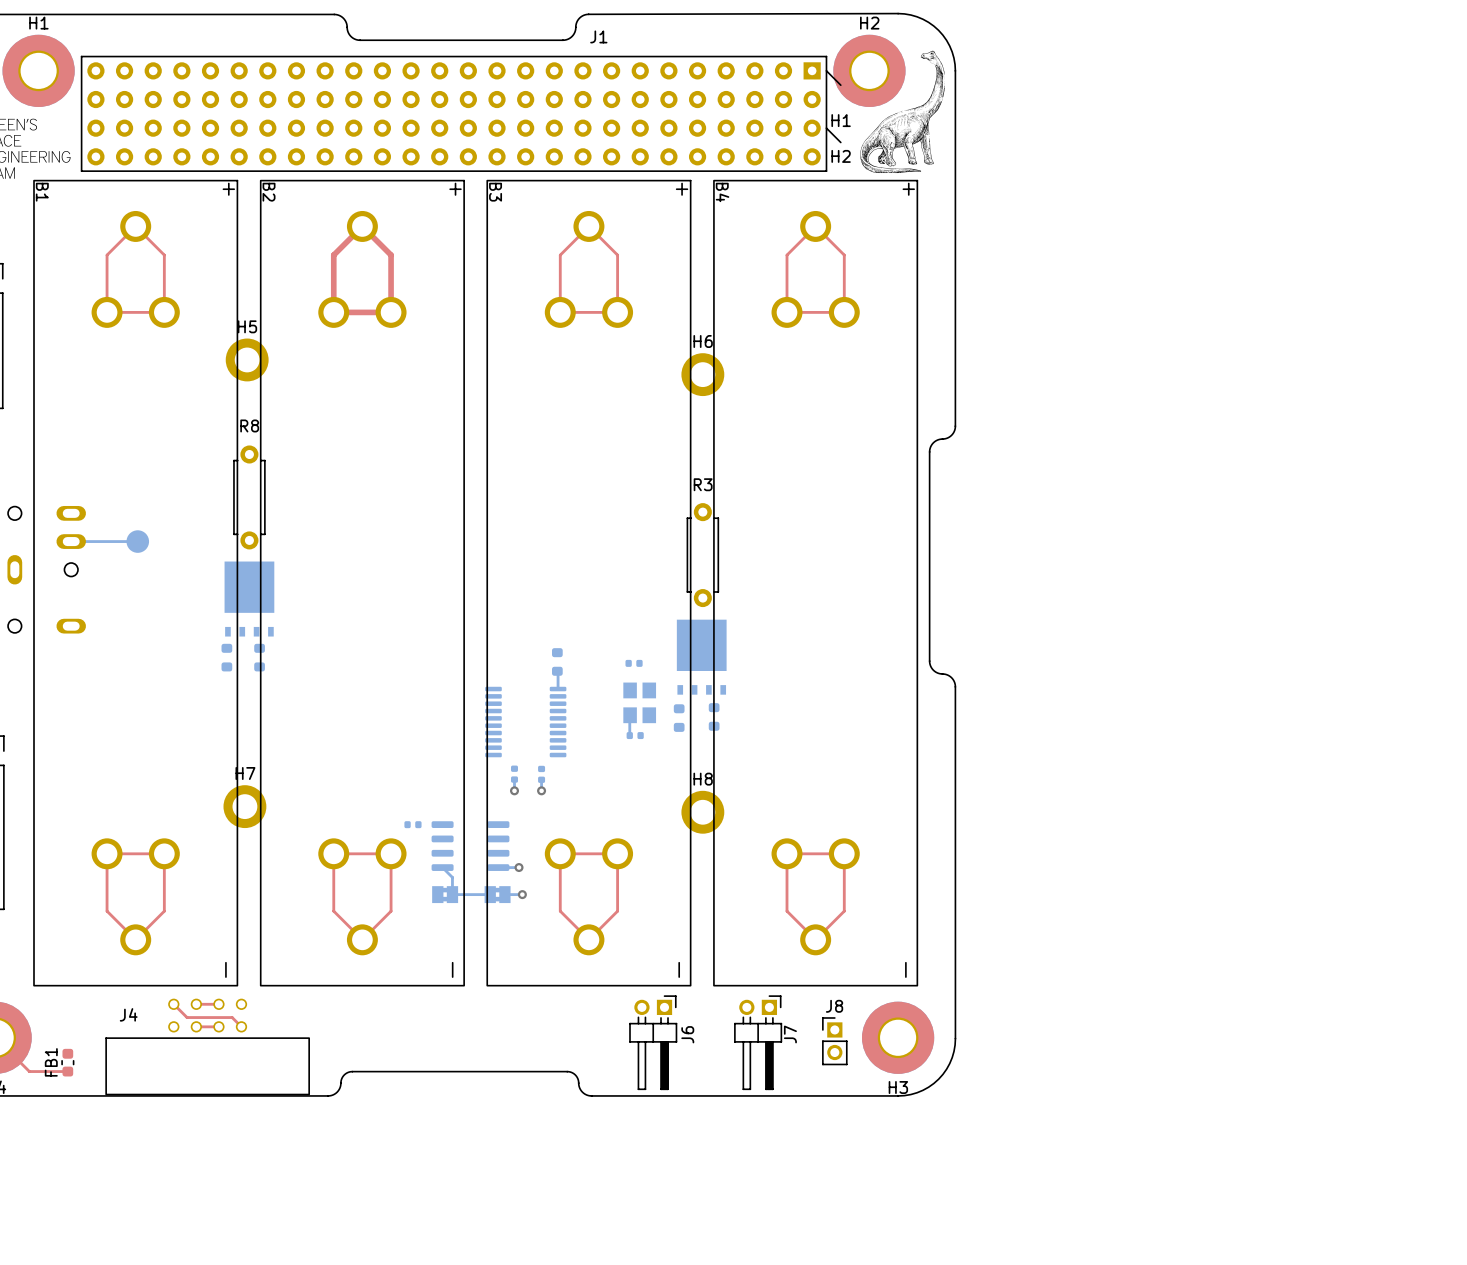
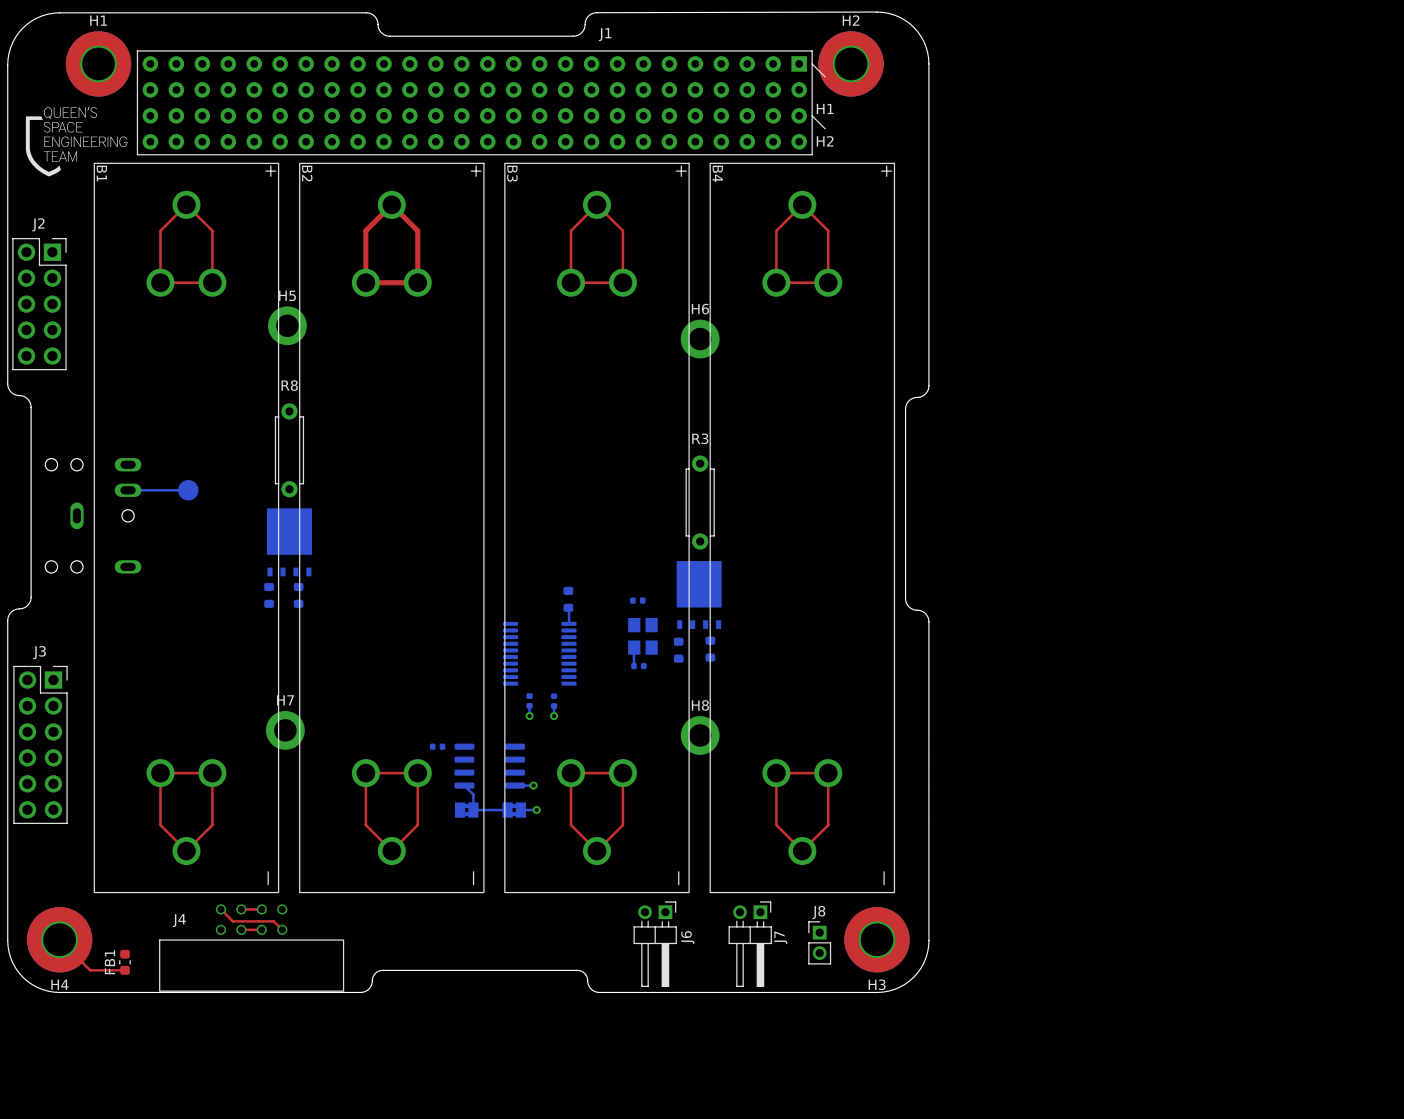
drawing: [860, 50, 945, 174] -> none

